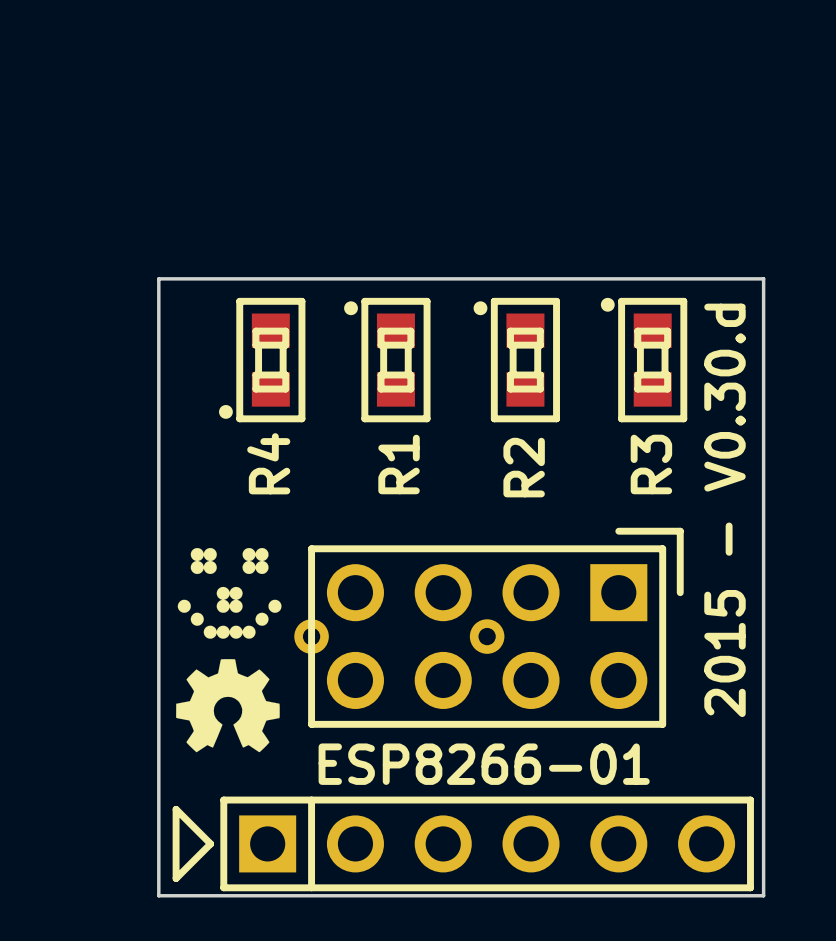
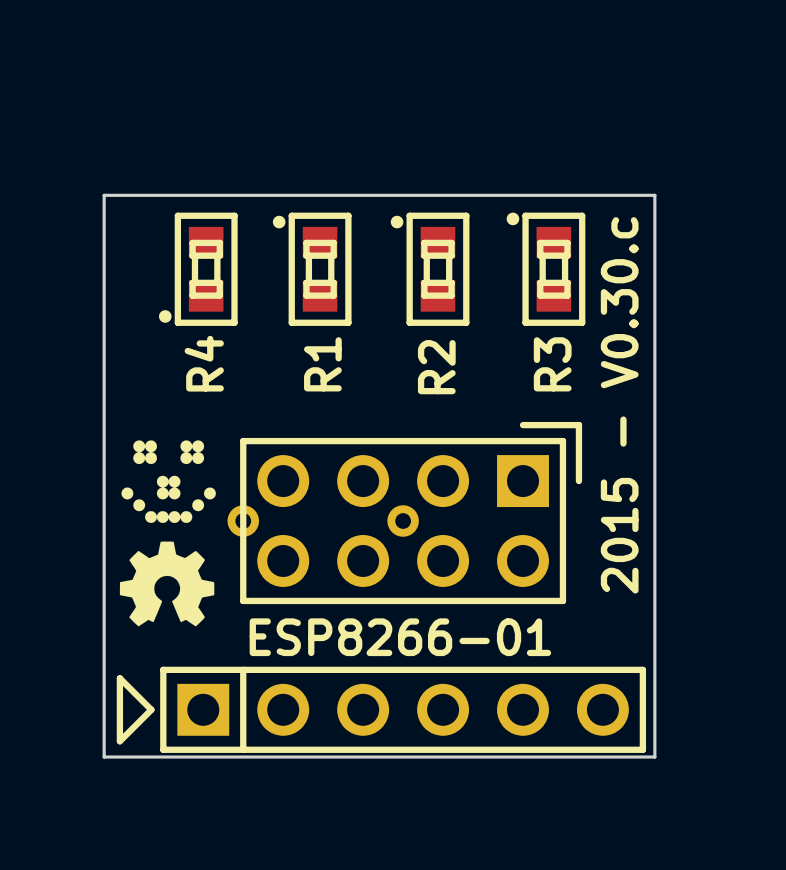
text: 2015 - V0.30.d (724, 510) -> 2015 - V0.30.c (619, 405)

